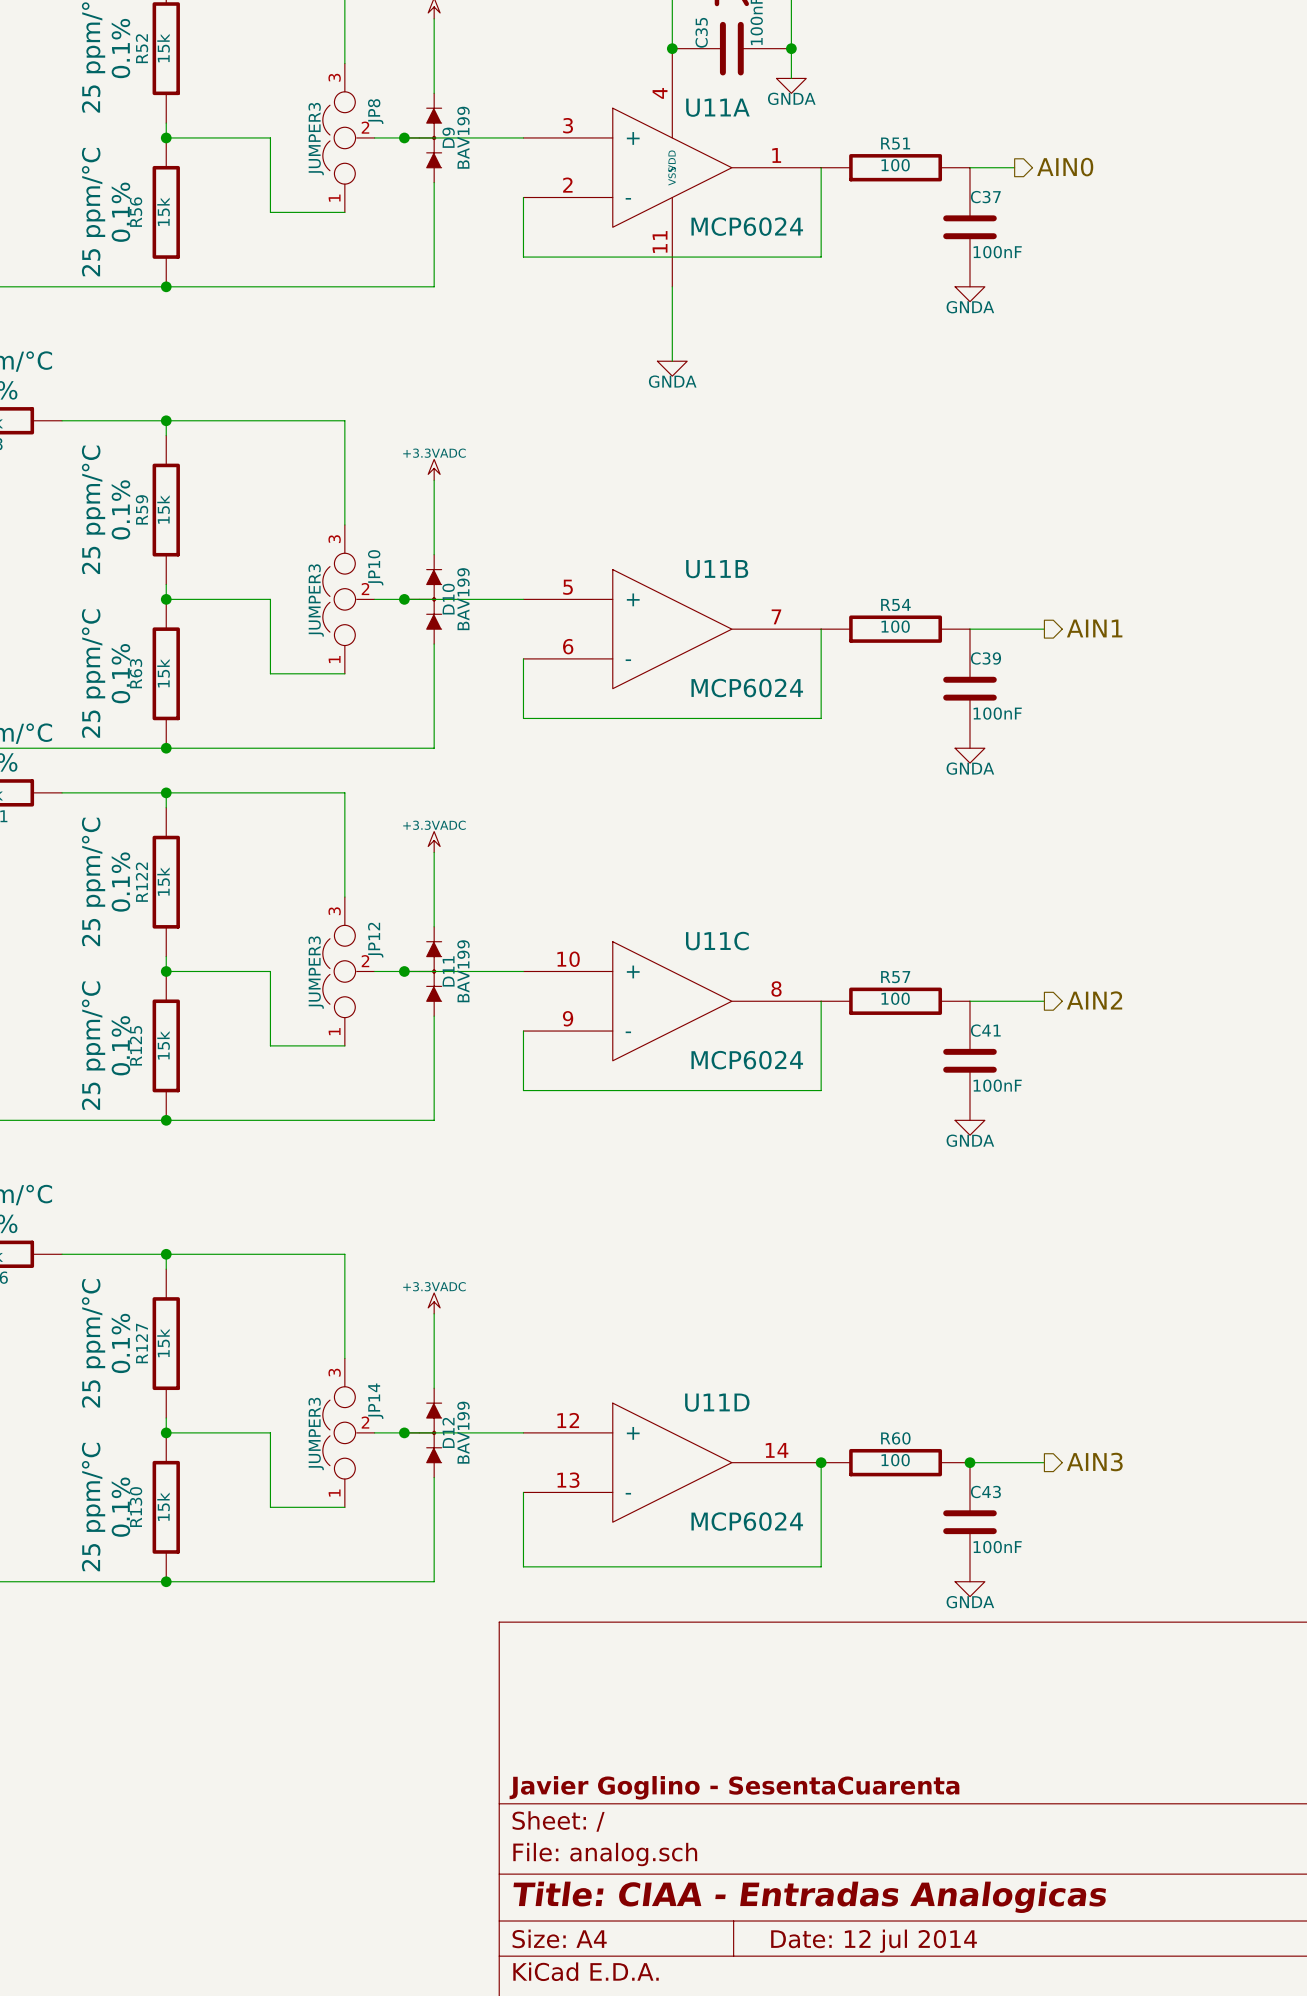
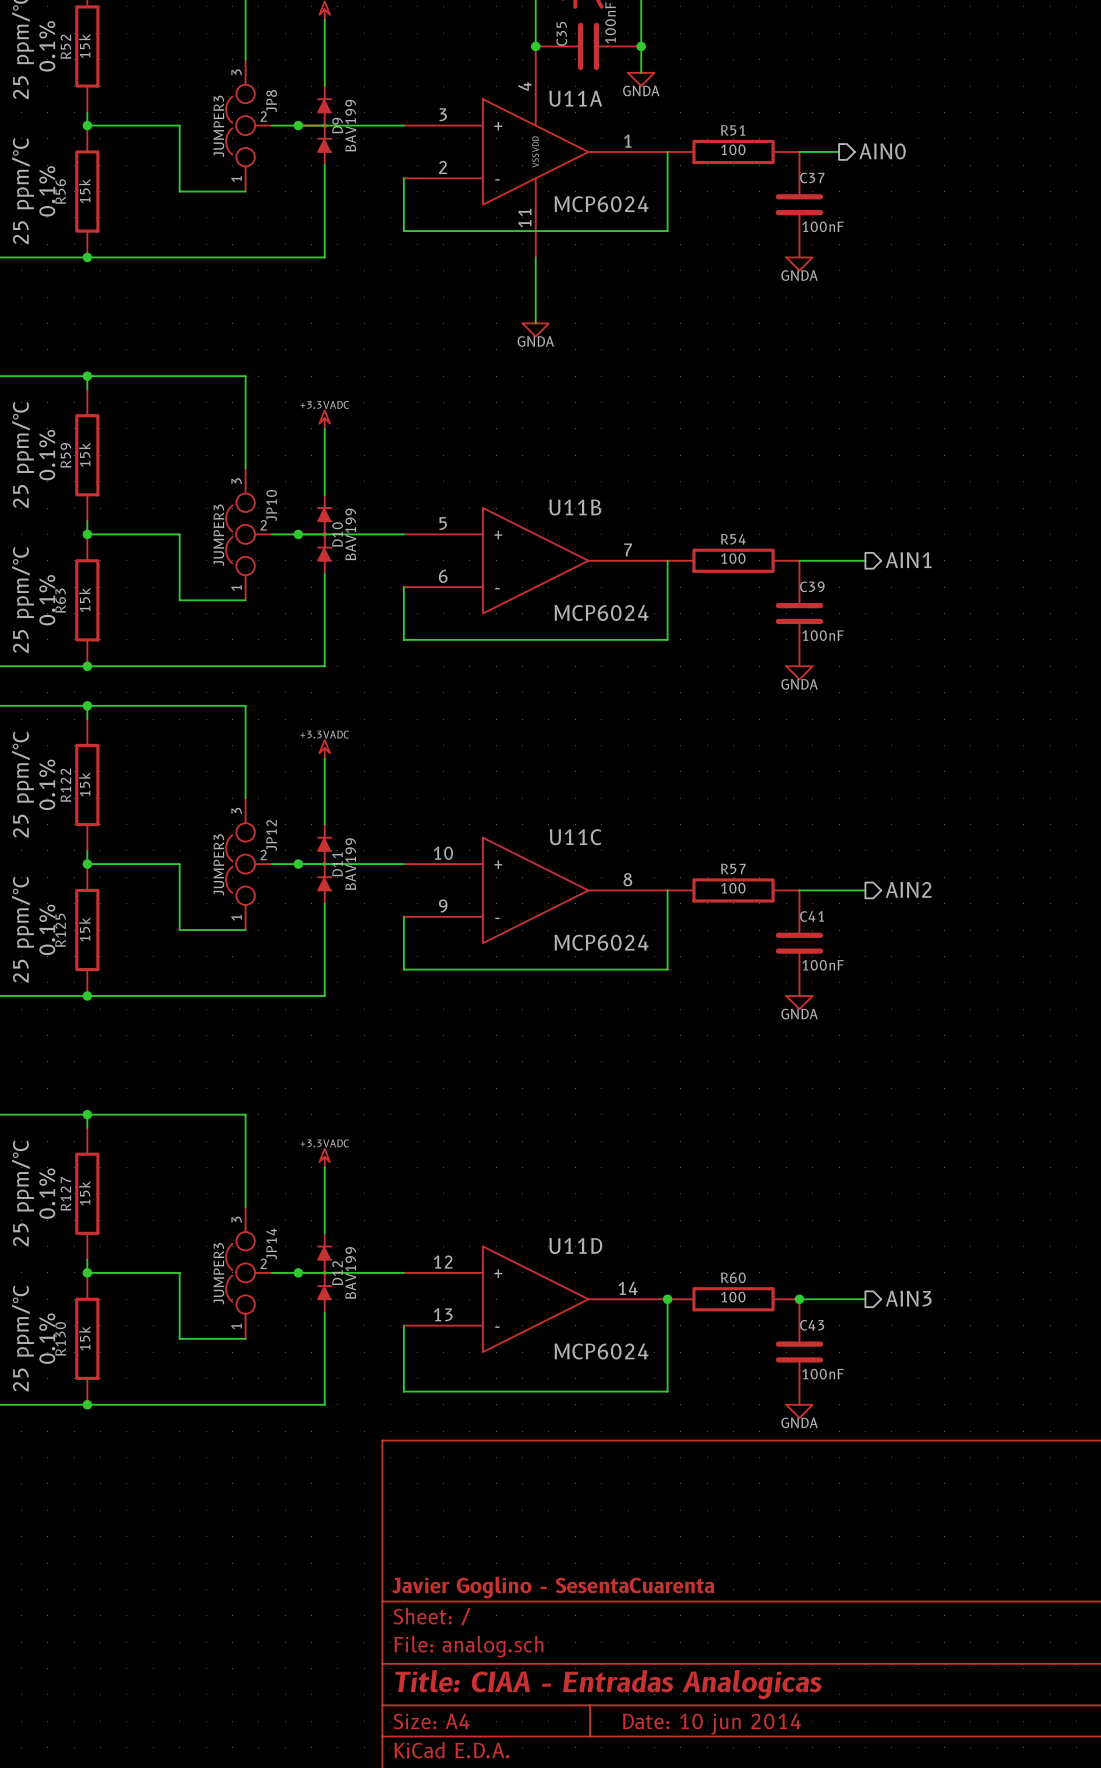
title block: Date: 12 jul 2014 (874, 1941) -> Date: 10 jun 2014 (711, 1724)

